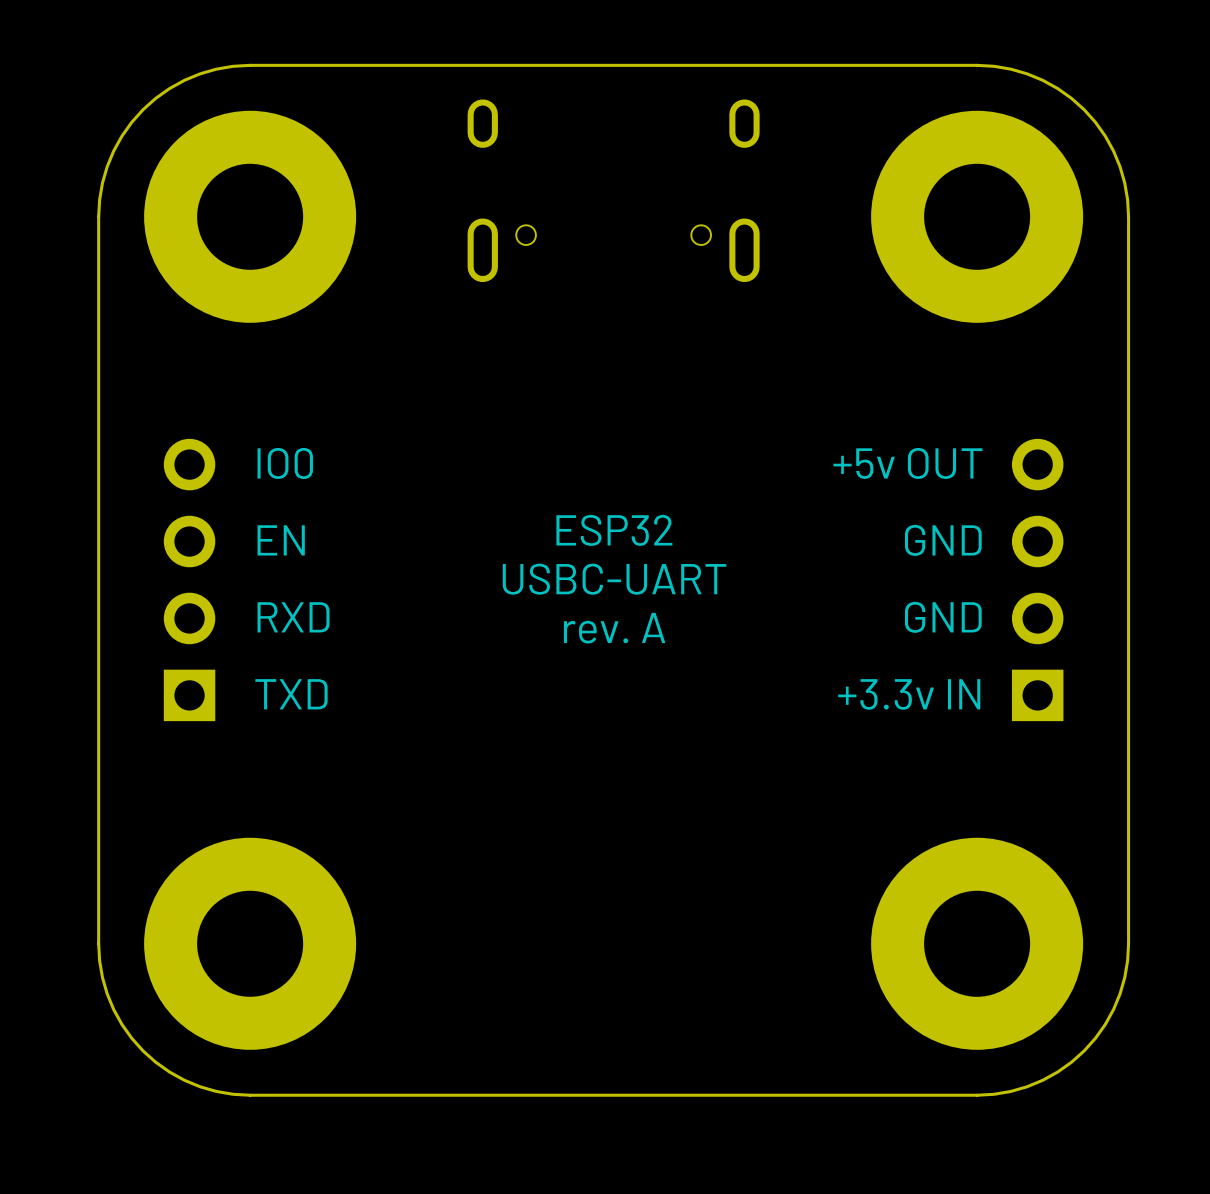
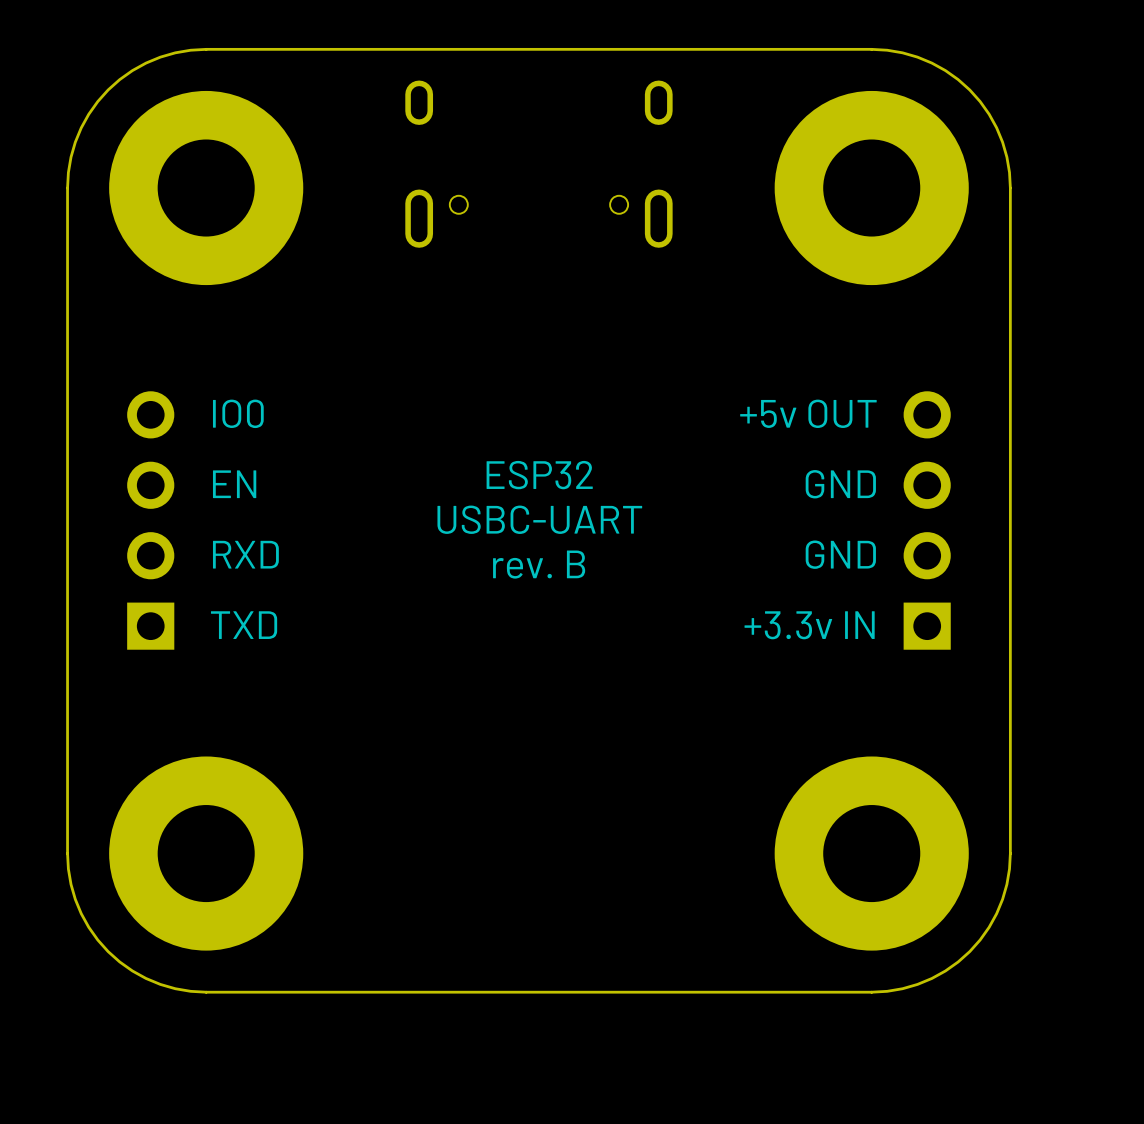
text: rev. A (614, 628) -> rev. B (539, 564)

